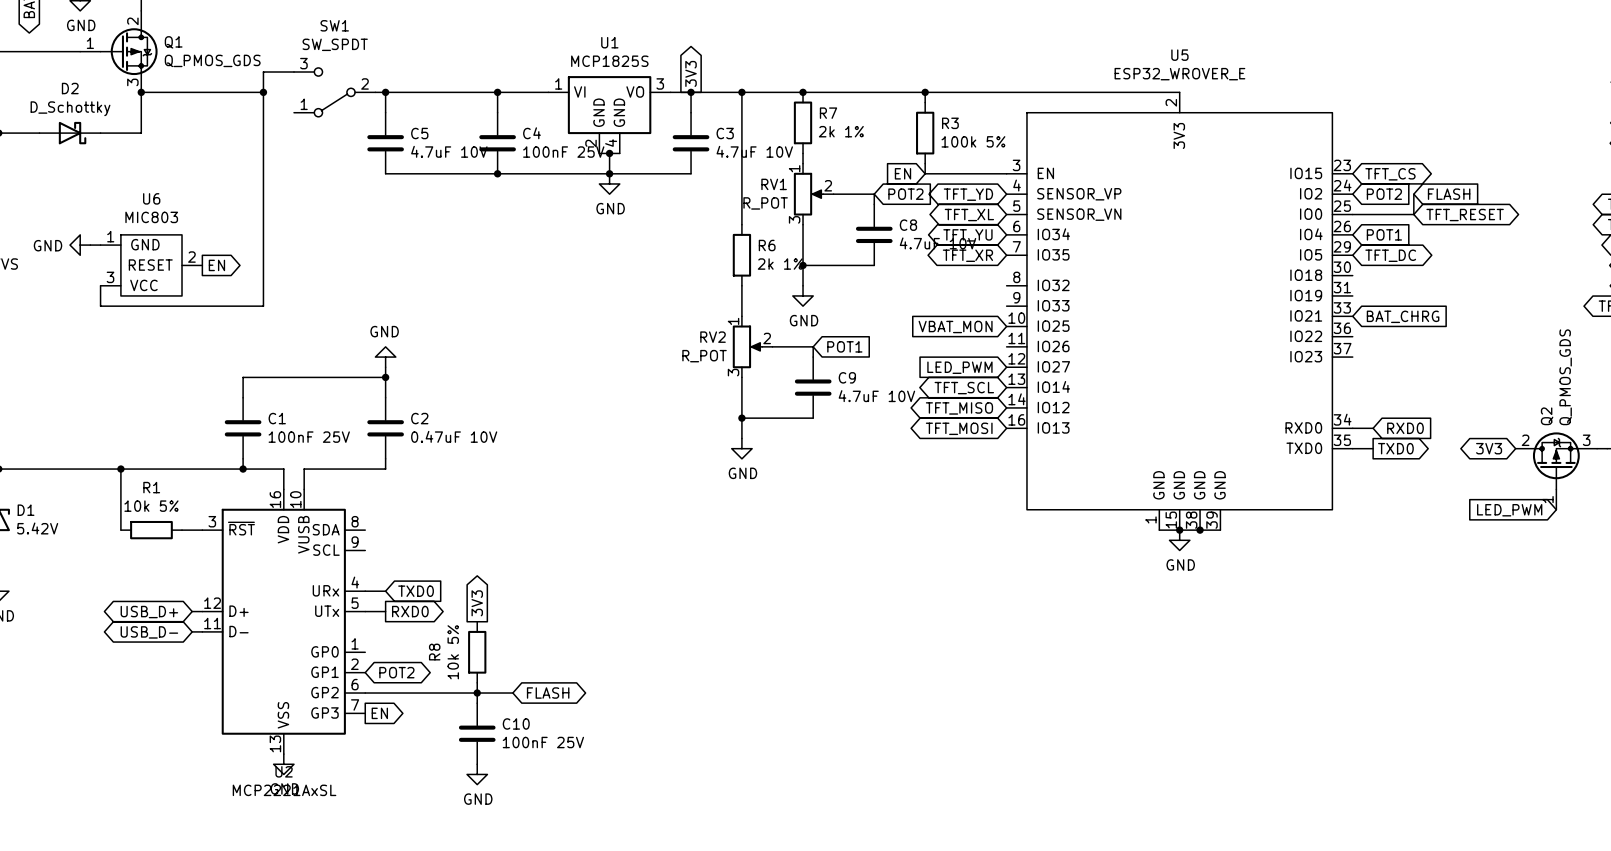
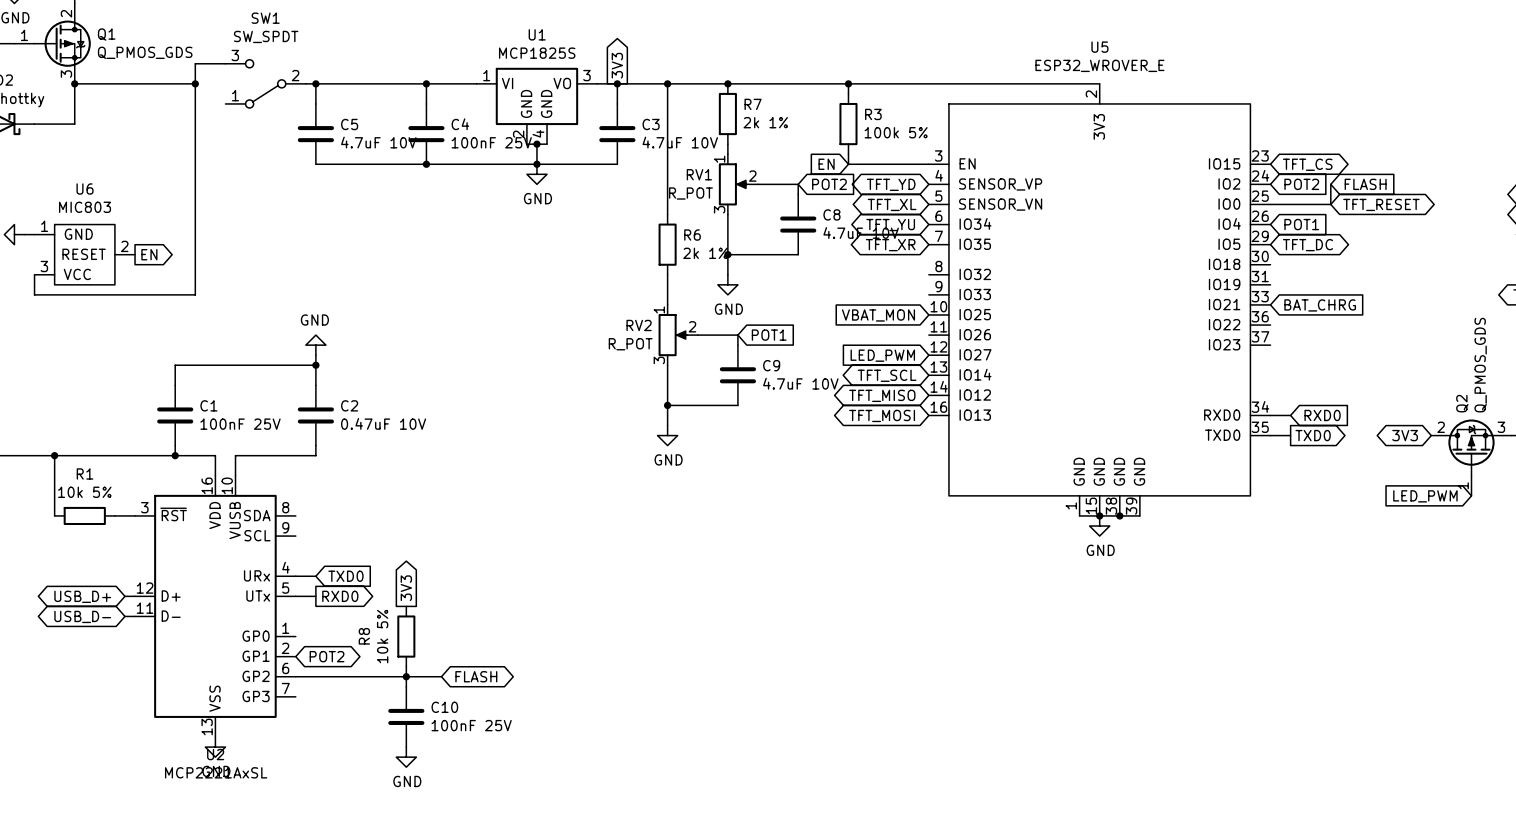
global label: EN (379, 713) -> none

